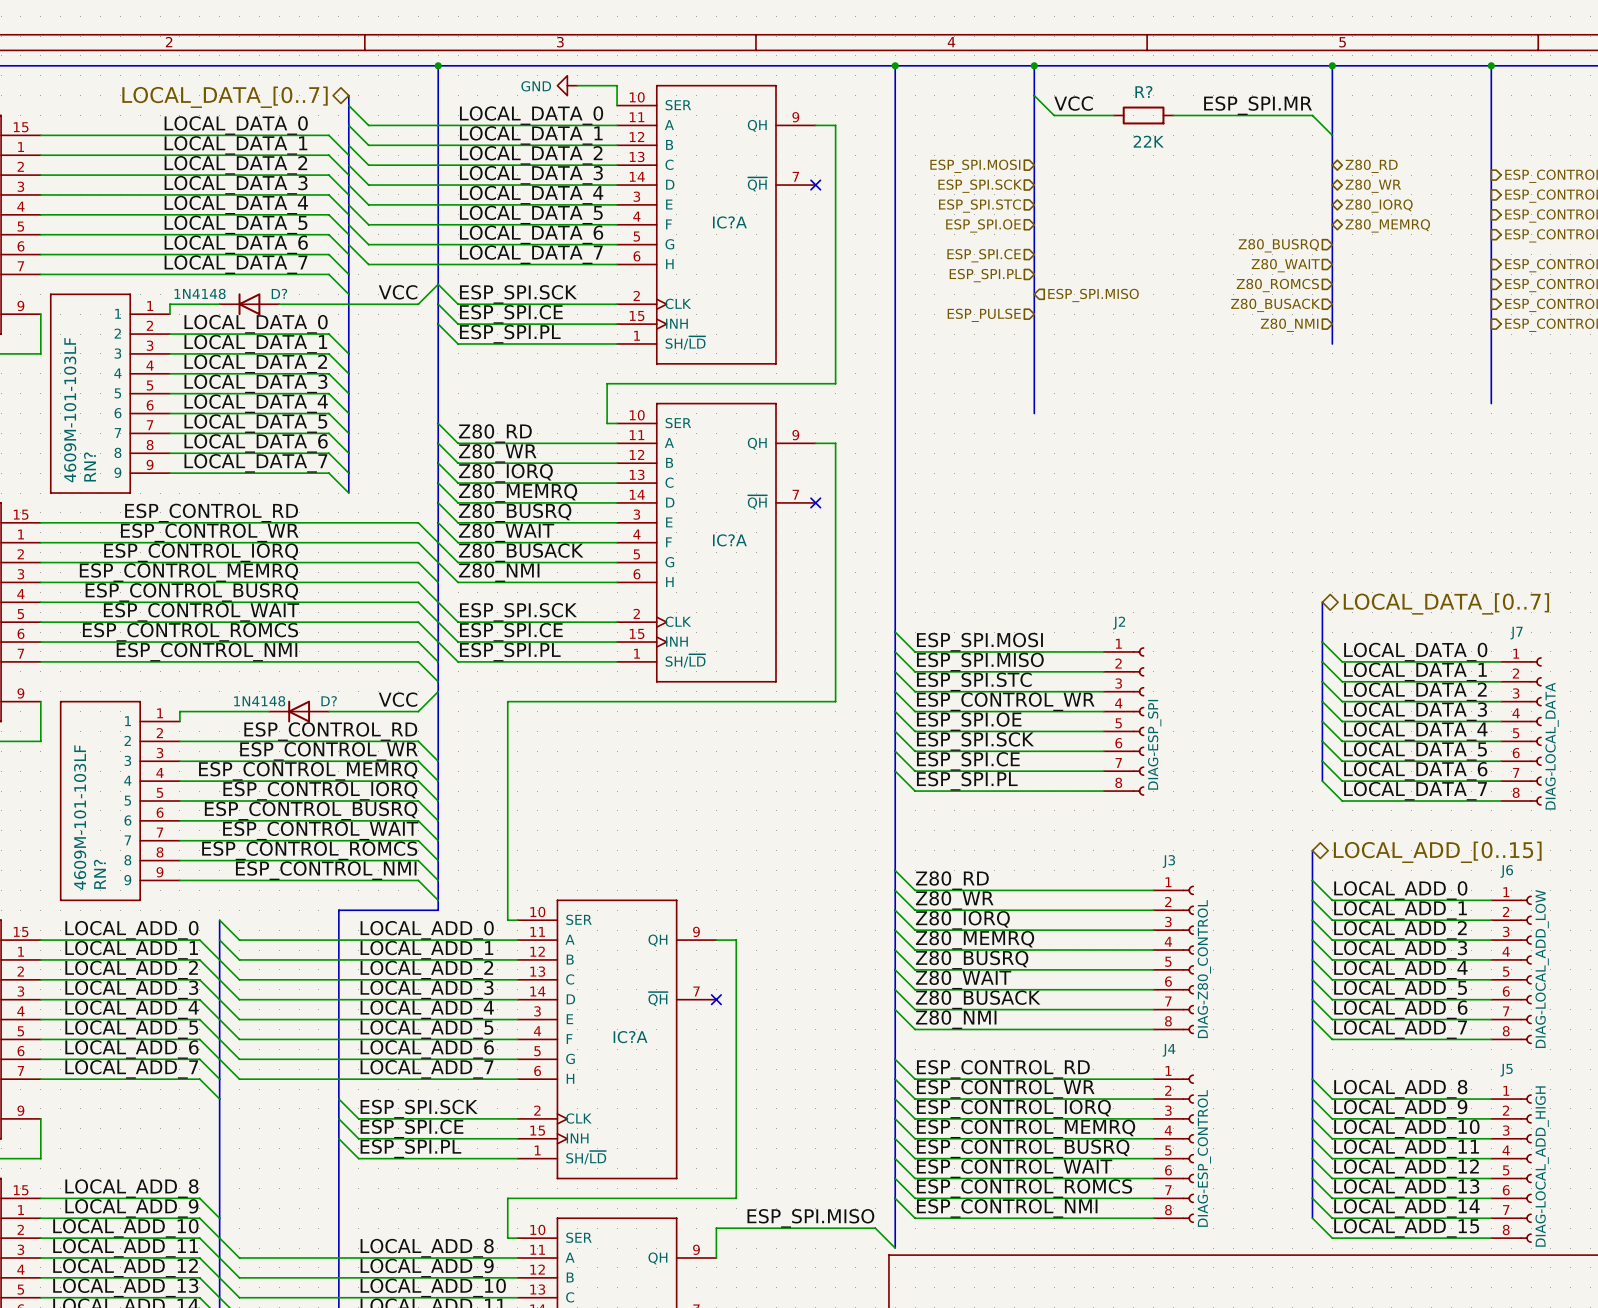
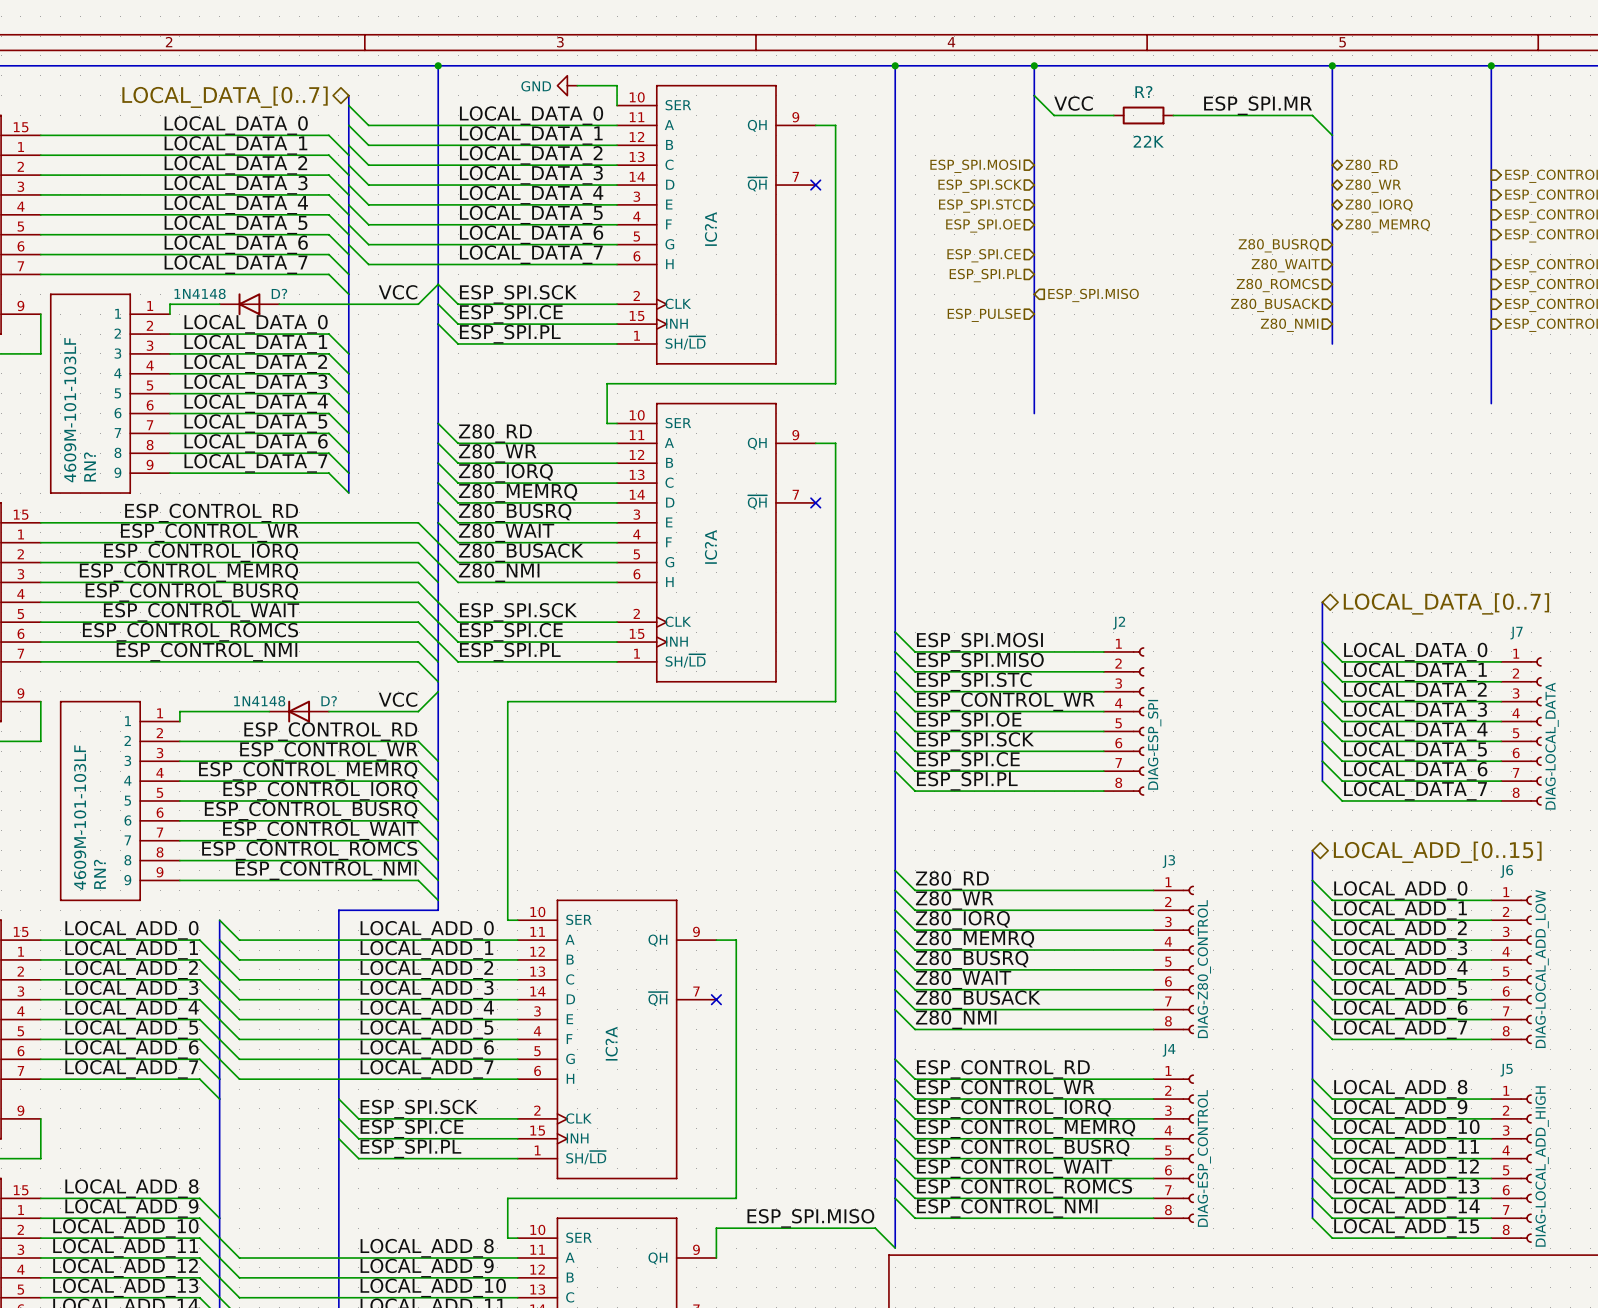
IC?A name rotation: 0° (729, 222) -> 90° counterclockwise (710, 229)
IC?A name rotation: 0° (729, 540) -> 90° counterclockwise (710, 546)
IC?A name rotation: 0° (630, 1037) -> 90° counterclockwise (611, 1043)

